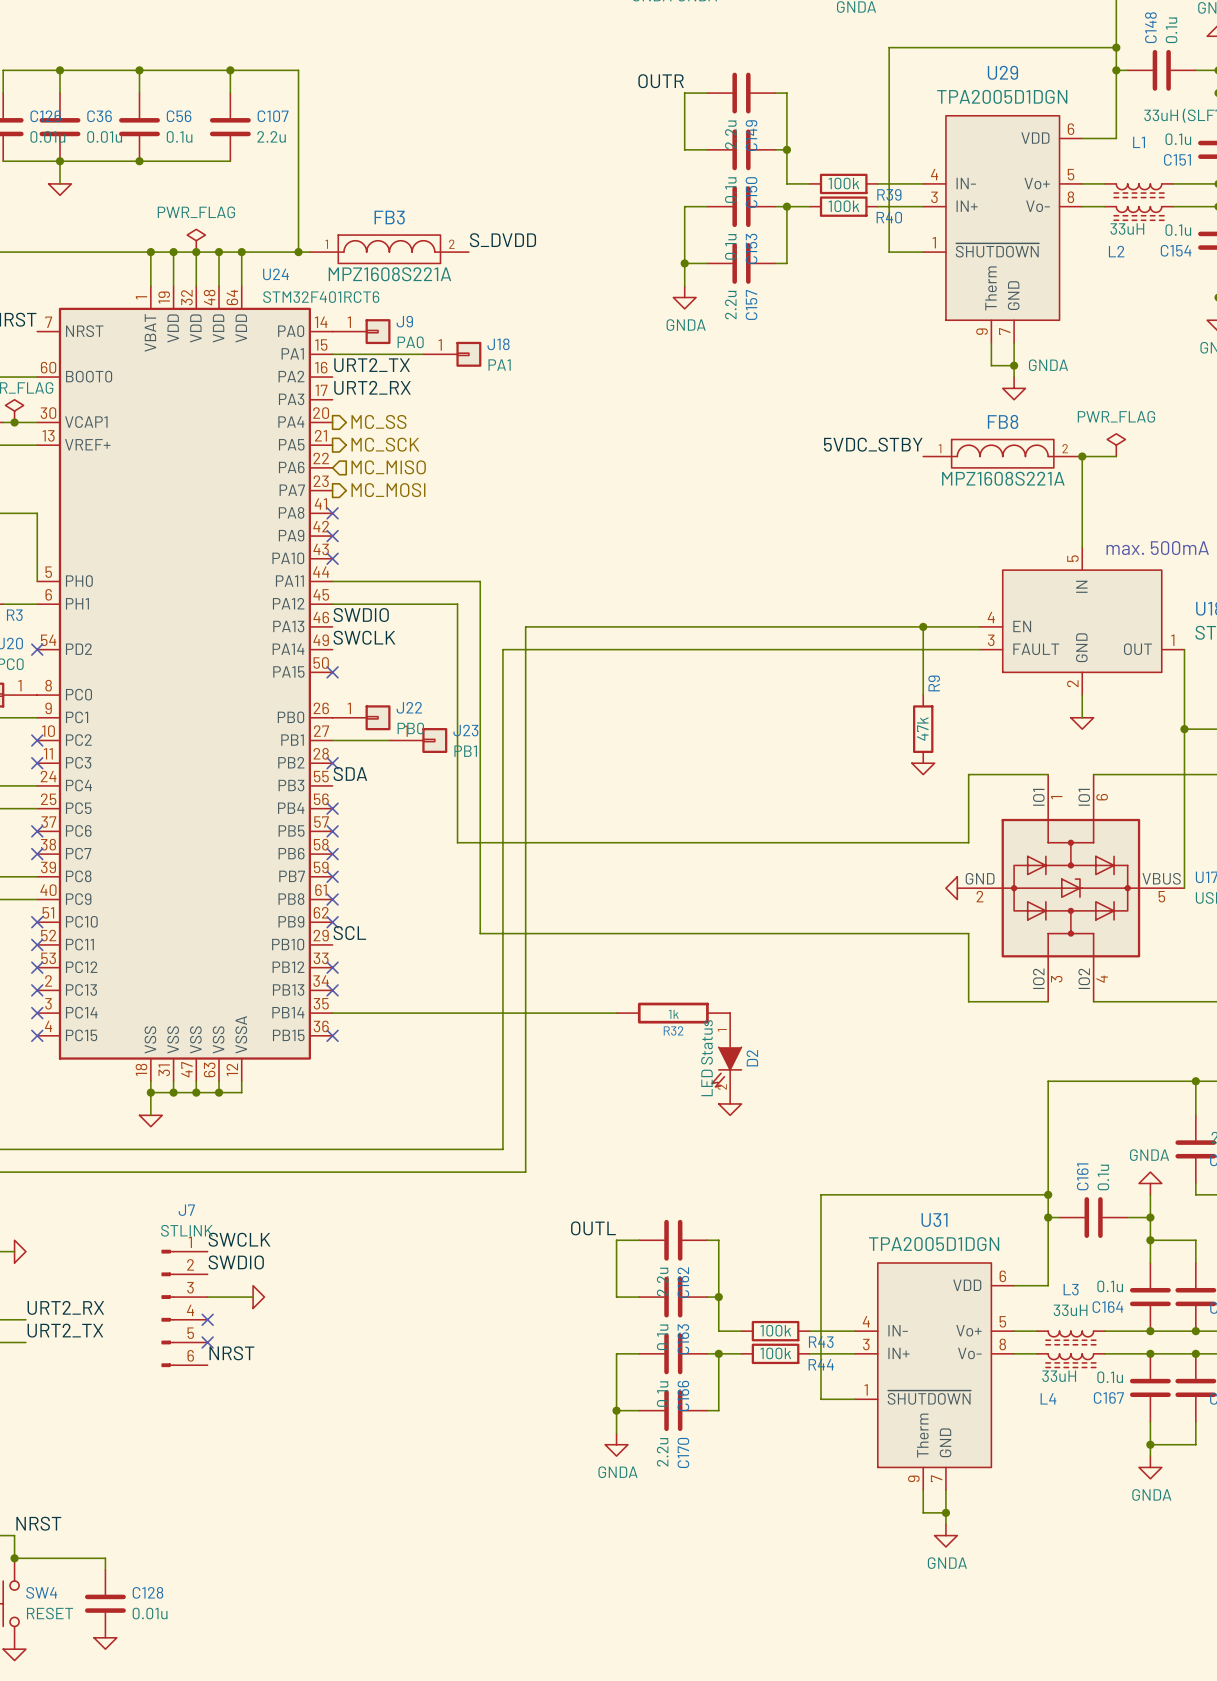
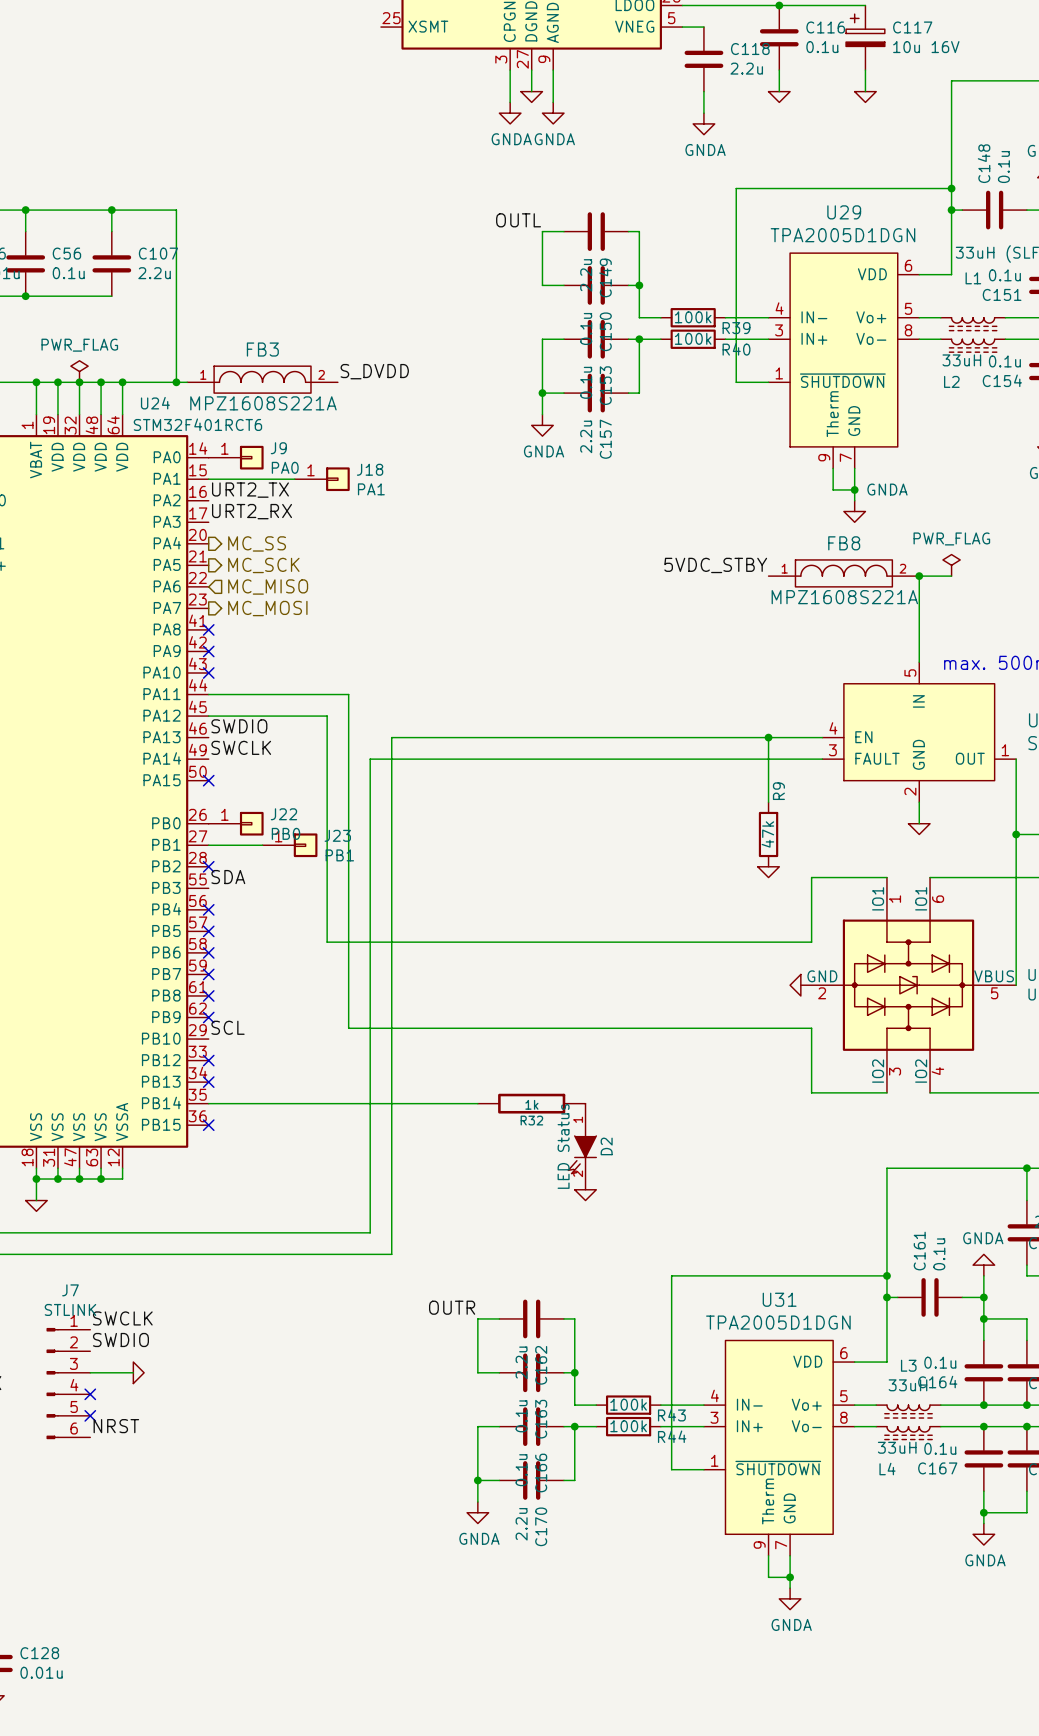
label: OUTR (661, 81) -> OUTL (518, 220)
label: OUTL (593, 1228) -> OUTR (452, 1307)

